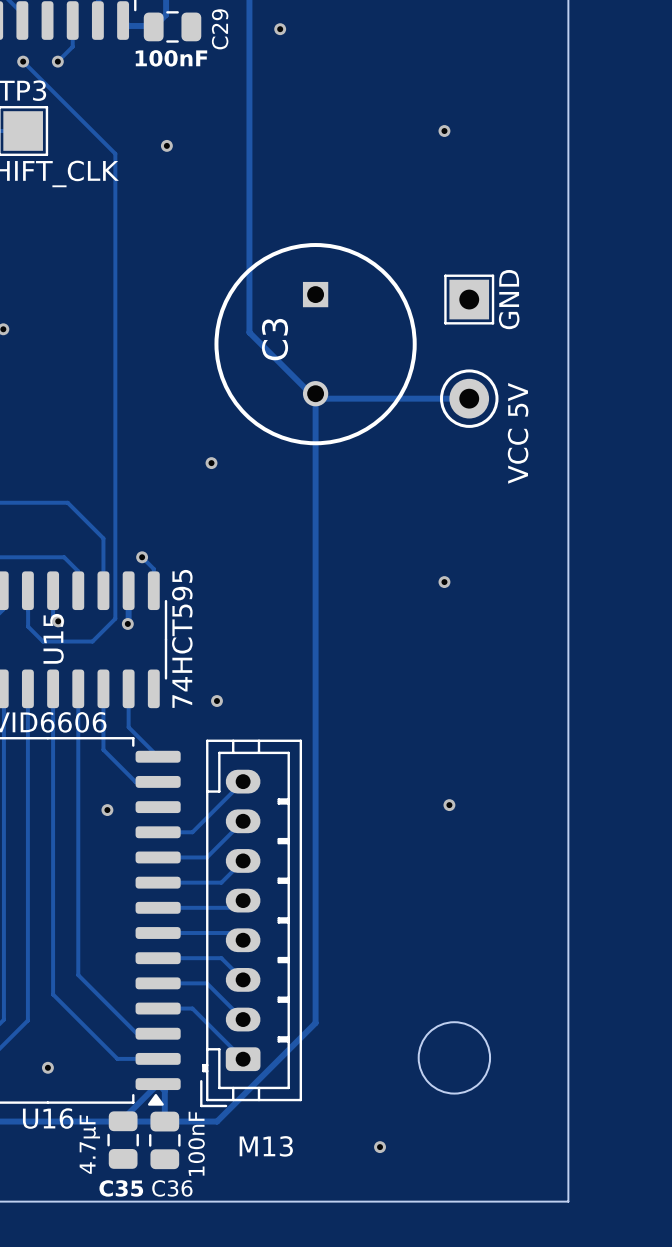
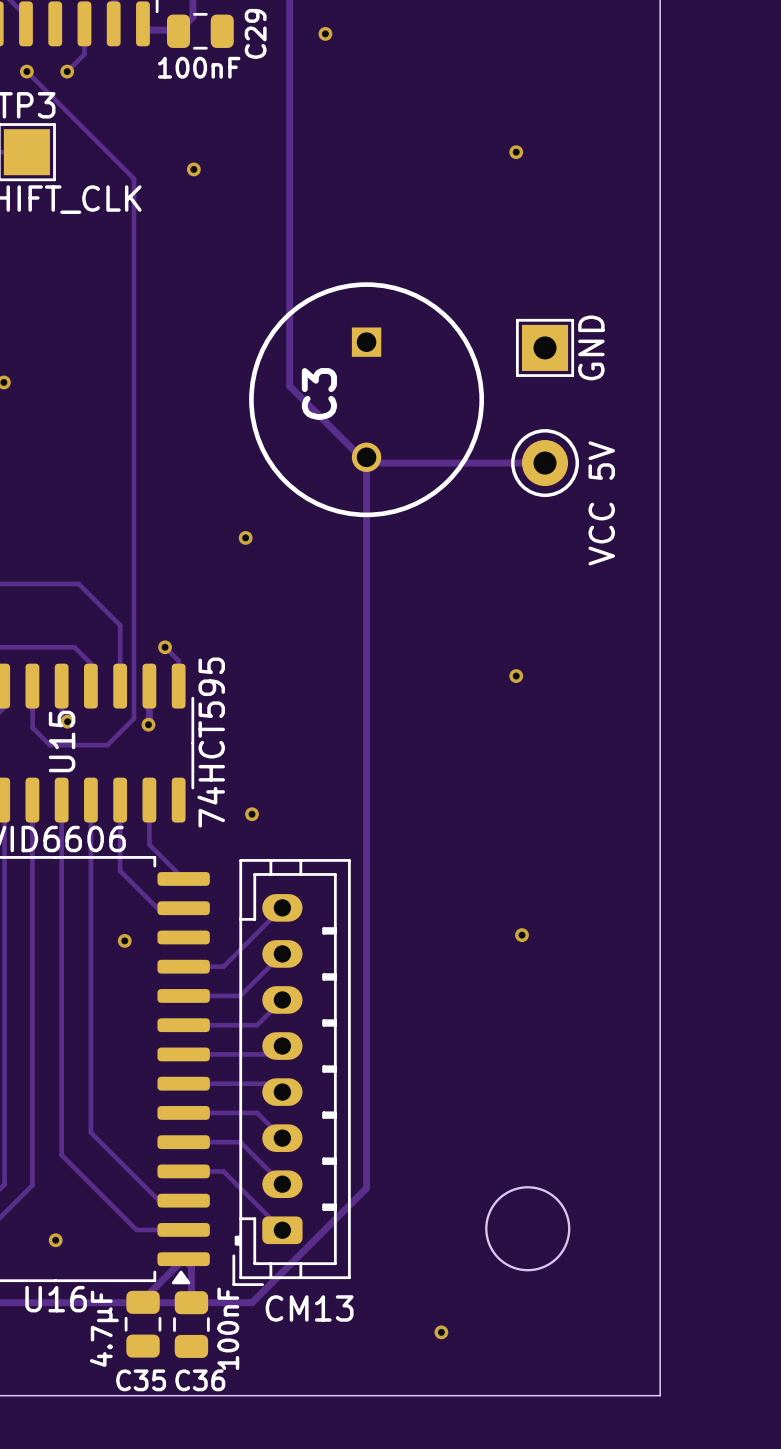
M13 name: M13 (266, 1146) -> CM13 (309, 1308)

